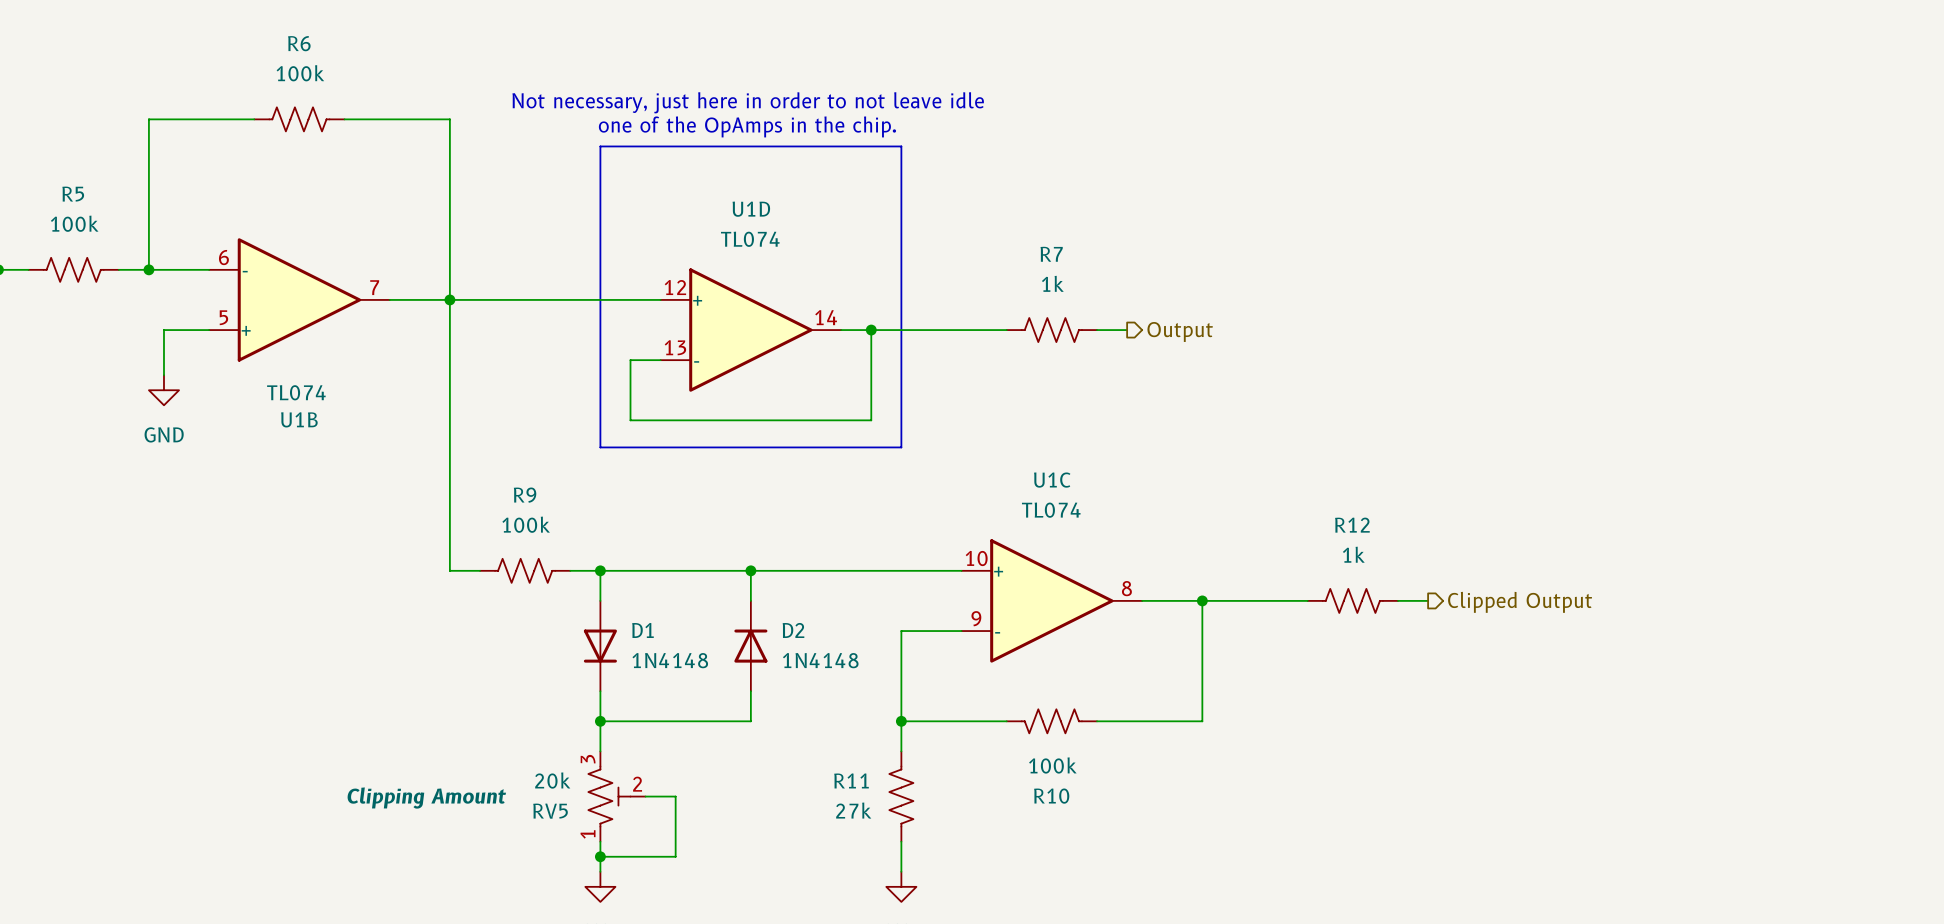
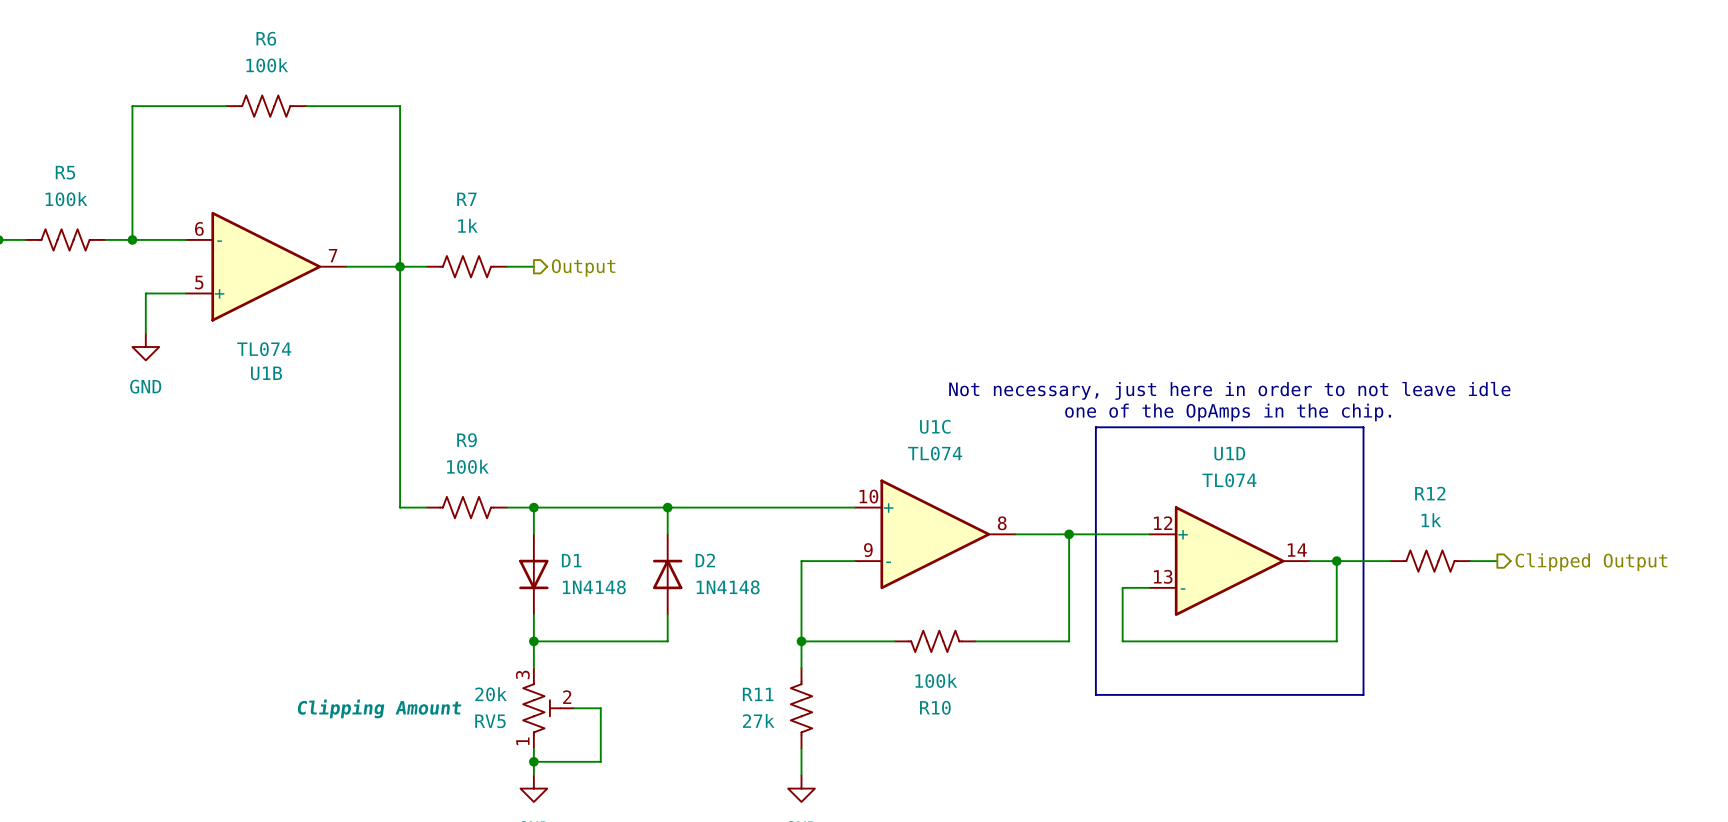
text: Not necessary, just here in order to not leave idle (748, 102) -> none
text: one of the OpAmps in the chip. (747, 126) -> none
line: (600, 146) (901, 146) (901, 447) (600, 447) (600, 146) -> none
wire: (600, 299) (660, 299) -> none
hierarchical label: none -> Output (583, 268)
U1D position: (750, 330) -> (1229, 561)
wire: (841, 330) (1006, 330) -> none
wire: (871, 330) (871, 420) (630, 420) (630, 360) (660, 360) -> none
junction: (871, 330) -> none
R7 position: (1051, 330) -> (466, 266)
wire: (1097, 330) (1127, 330) -> none
hierarchical label: Output (1180, 331) -> none
text: none -> Not necessary, just here in order to not leave idle (1229, 390)
text: none -> one of the OpAmps in the chip. (1228, 412)
line: none -> (1095, 427) (1363, 427) (1363, 694) (1095, 694) (1095, 427)
R12 position: (1352, 600) -> (1430, 561)
wire: (1397, 600) (1428, 600) -> (1470, 561) (1497, 561)
hierarchical label position: Clipped Output (1520, 602) -> Clipped Output (1591, 562)
wire: none -> (1309, 561) (1390, 561)
wire: none -> (1336, 561) (1336, 641) (1122, 641) (1122, 587) (1149, 587)
junction: none -> (1336, 561)

